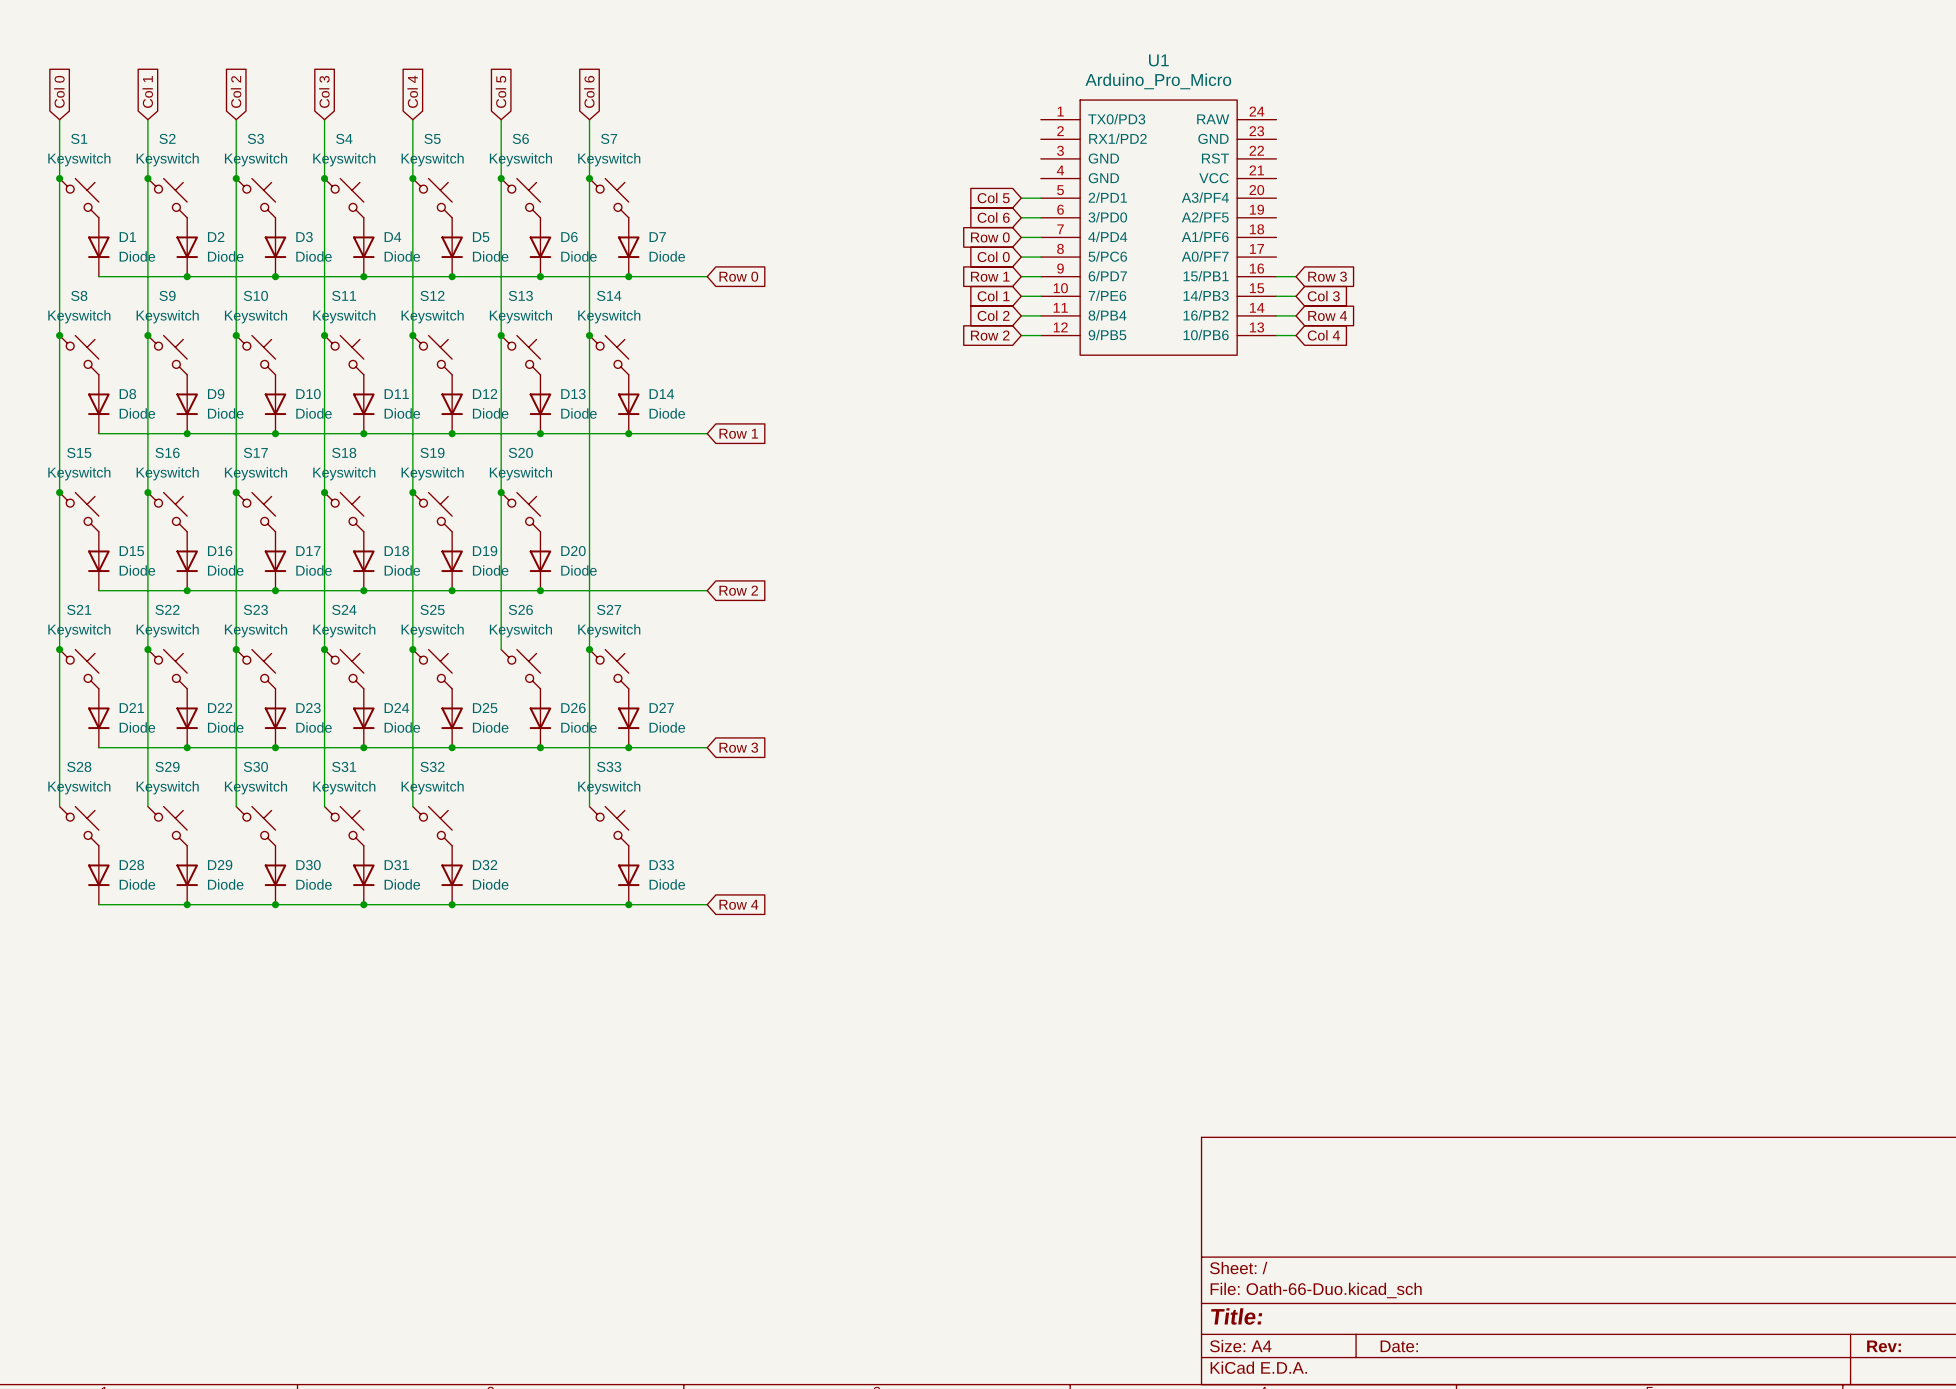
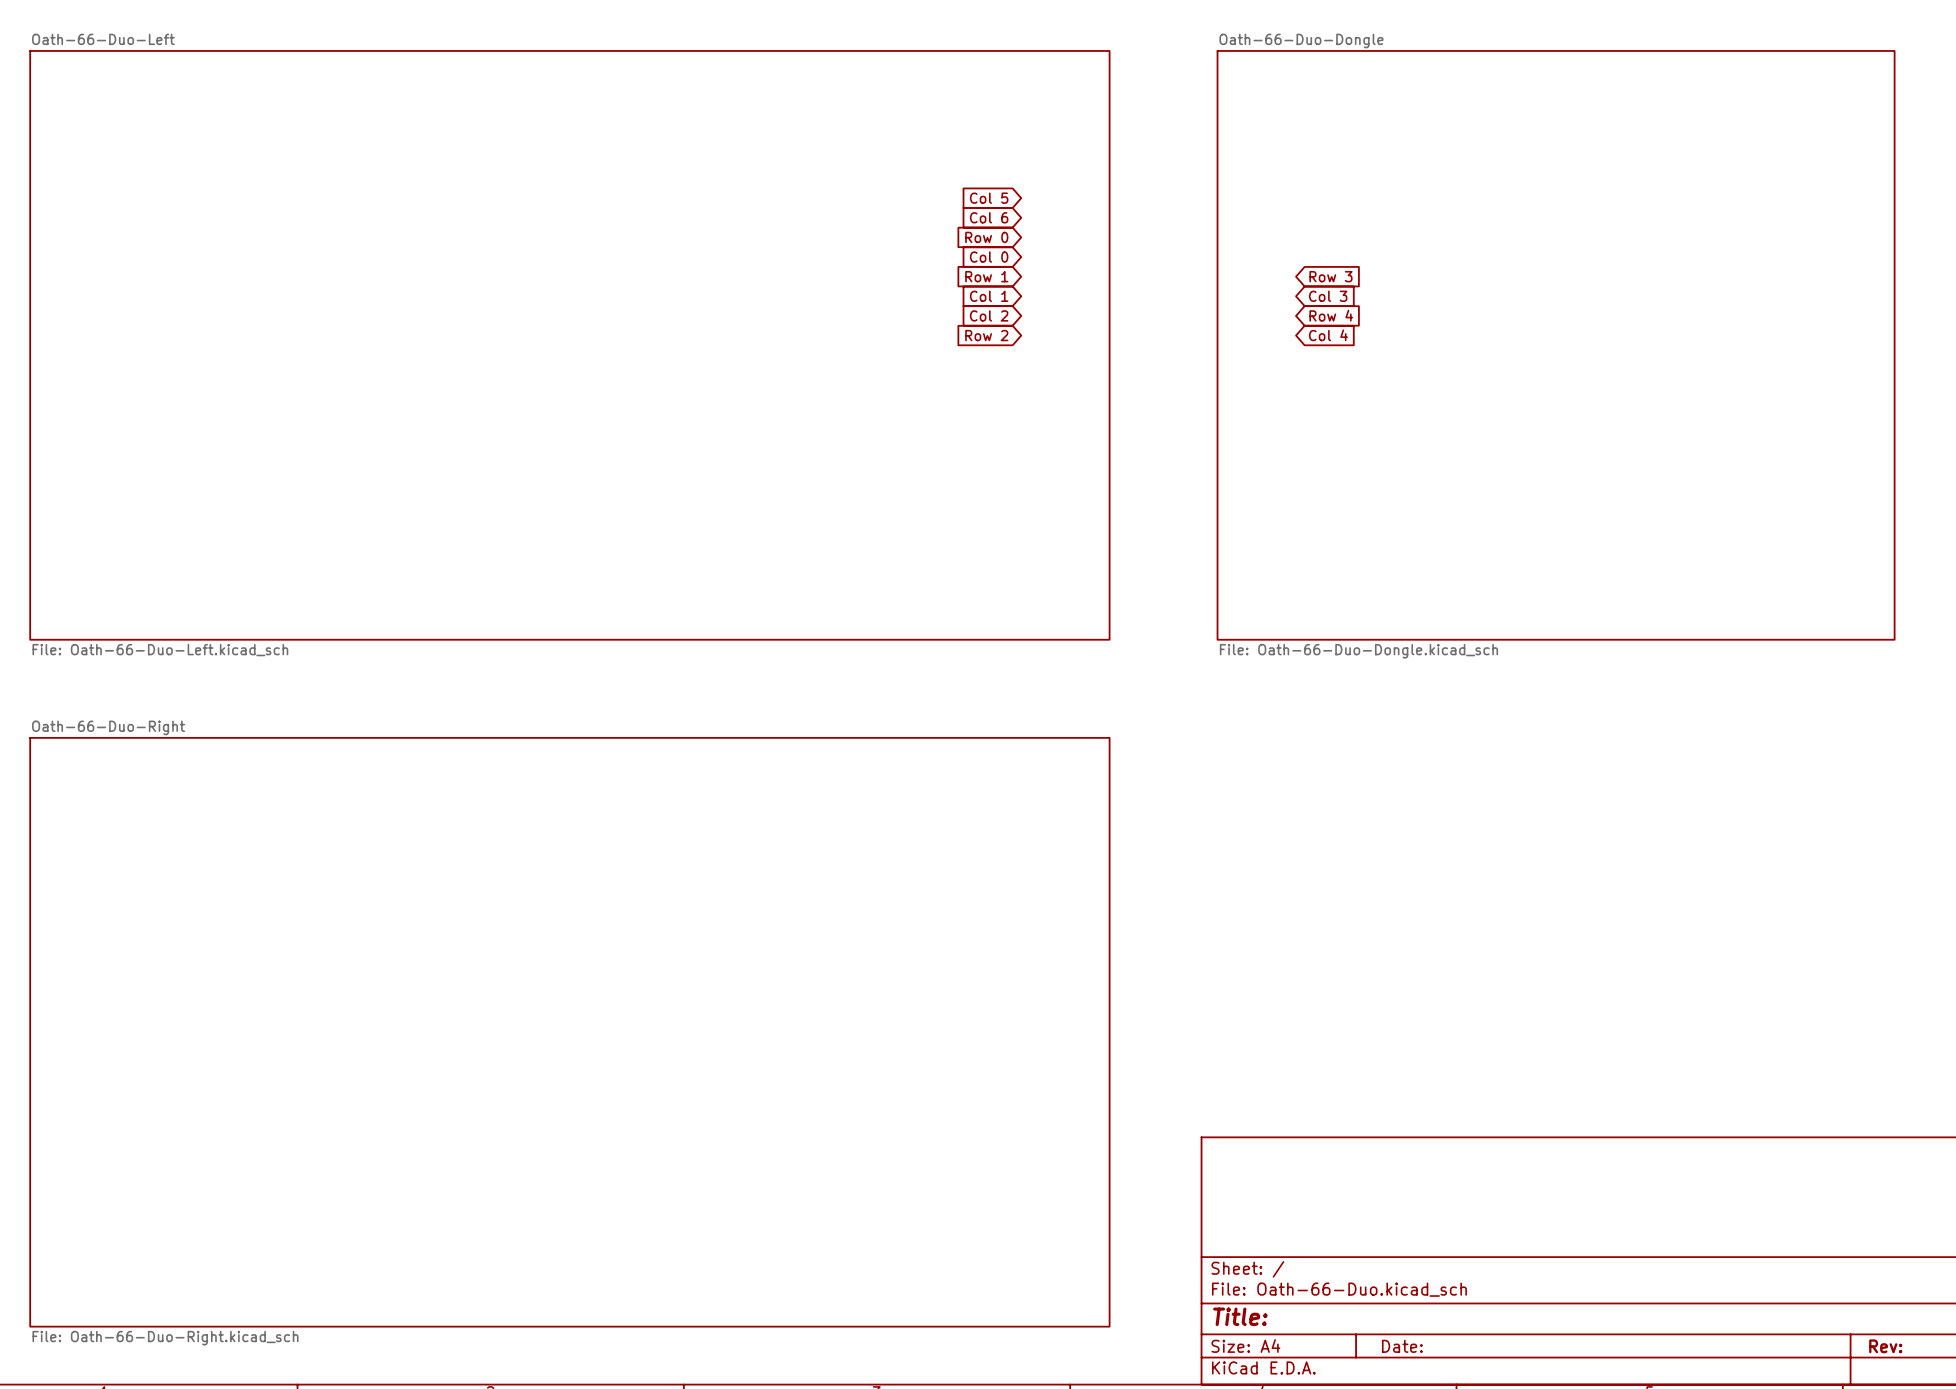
global label: Col 0 (59, 91) -> none
global label: Col 1 (147, 91) -> none
global label: Col 2 (236, 91) -> none
global label: Col 3 (324, 91) -> none
global label: Col 4 (412, 91) -> none
global label: Col 5 (500, 91) -> none
global label: Col 6 (589, 91) -> none
wire: (59, 119) (59, 806) -> none
wire: (147, 119) (147, 806) -> none
wire: (236, 119) (236, 806) -> none
wire: (324, 119) (324, 806) -> none
wire: (412, 119) (412, 806) -> none
wire: (501, 119) (501, 649) -> none
wire: (589, 119) (589, 806) -> none
junction: (59, 178) -> none
junction: (147, 178) -> none
junction: (236, 178) -> none
junction: (324, 178) -> none
junction: (412, 178) -> none
junction: (501, 178) -> none
junction: (589, 178) -> none
S1: Keyswitch (79, 198) -> none
S2: Keyswitch (167, 198) -> none
S3: Keyswitch (255, 198) -> none
S4: Keyswitch (344, 198) -> none
S5: Keyswitch (432, 198) -> none
S6: Keyswitch (520, 198) -> none
S7: Keyswitch (609, 198) -> none
wire: (1021, 198) (1040, 198) -> none
wire: (1021, 217) (1040, 217) -> none
U1: Arduino_Pro_Micro (1158, 227) -> none
wire: (1021, 237) (1040, 237) -> none
D1: Diode (98, 247) -> none
D2: Diode (187, 247) -> none
D3: Diode (275, 247) -> none
D4: Diode (363, 247) -> none
D5: Diode (452, 247) -> none
D6: Diode (540, 247) -> none
D7: Diode (628, 247) -> none
wire: (1021, 257) (1040, 257) -> none
wire: (98, 276) (707, 276) -> none
junction: (187, 276) -> none
junction: (275, 276) -> none
junction: (363, 276) -> none
junction: (452, 276) -> none
junction: (540, 276) -> none
junction: (628, 276) -> none
global label: Row 0 (738, 276) -> none
wire: (1021, 276) (1040, 276) -> none
wire: (1276, 276) (1296, 276) -> none
wire: (1021, 296) (1040, 296) -> none
wire: (1276, 296) (1296, 296) -> none
wire: (1021, 315) (1040, 315) -> none
wire: (1276, 315) (1296, 315) -> none
junction: (59, 335) -> none
junction: (147, 335) -> none
junction: (236, 335) -> none
junction: (324, 335) -> none
junction: (412, 335) -> none
junction: (501, 335) -> none
junction: (589, 335) -> none
wire: (1021, 335) (1040, 335) -> none
wire: (1276, 335) (1296, 335) -> none
sheet Oath-66-Duo-Left: none -> File: Oath-66-Duo-Left.kicad_sch (569, 345)
sheet Oath-66-Duo-Dongle: none -> File: Oath-66-Duo-Dongle.kicad_sch (1556, 345)
S8: Keyswitch (79, 355) -> none
S9: Keyswitch (167, 355) -> none
S10: Keyswitch (255, 355) -> none
S11: Keyswitch (344, 355) -> none
S12: Keyswitch (432, 355) -> none
S13: Keyswitch (520, 355) -> none
S14: Keyswitch (609, 355) -> none
D8: Diode (98, 404) -> none
D9: Diode (187, 404) -> none
D10: Diode (275, 404) -> none
D11: Diode (363, 404) -> none
D12: Diode (452, 404) -> none
D13: Diode (540, 404) -> none
D14: Diode (628, 404) -> none
wire: (98, 433) (707, 433) -> none
junction: (187, 433) -> none
junction: (275, 433) -> none
junction: (363, 433) -> none
junction: (452, 433) -> none
junction: (540, 433) -> none
junction: (628, 433) -> none
global label: Row 1 (738, 433) -> none
junction: (59, 492) -> none
junction: (147, 492) -> none
junction: (236, 492) -> none
junction: (324, 492) -> none
junction: (412, 492) -> none
junction: (501, 492) -> none
S15: Keyswitch (79, 512) -> none
S16: Keyswitch (167, 512) -> none
S17: Keyswitch (255, 512) -> none
S18: Keyswitch (344, 512) -> none
S19: Keyswitch (432, 512) -> none
S20: Keyswitch (520, 512) -> none
D15: Diode (98, 561) -> none
D16: Diode (187, 561) -> none
D17: Diode (275, 561) -> none
D18: Diode (363, 561) -> none
D19: Diode (452, 561) -> none
D20: Diode (540, 561) -> none
wire: (98, 590) (707, 590) -> none
junction: (187, 590) -> none
junction: (275, 590) -> none
junction: (363, 590) -> none
junction: (452, 590) -> none
junction: (540, 590) -> none
global label: Row 2 (738, 590) -> none
junction: (59, 649) -> none
junction: (147, 649) -> none
junction: (236, 649) -> none
junction: (324, 649) -> none
junction: (412, 649) -> none
junction: (589, 649) -> none
S21: Keyswitch (79, 669) -> none
S22: Keyswitch (167, 669) -> none
S23: Keyswitch (255, 669) -> none
S24: Keyswitch (344, 669) -> none
S25: Keyswitch (432, 669) -> none
S26: Keyswitch (520, 669) -> none
S27: Keyswitch (609, 669) -> none
D21: Diode (98, 718) -> none
D22: Diode (187, 718) -> none
D23: Diode (275, 718) -> none
D24: Diode (363, 718) -> none
D25: Diode (452, 718) -> none
D26: Diode (540, 718) -> none
D27: Diode (628, 718) -> none
wire: (98, 747) (707, 747) -> none
junction: (187, 747) -> none
junction: (275, 747) -> none
junction: (363, 747) -> none
junction: (452, 747) -> none
junction: (540, 747) -> none
junction: (628, 747) -> none
global label: Row 3 (738, 747) -> none
S28: Keyswitch (79, 826) -> none
S29: Keyswitch (167, 826) -> none
S30: Keyswitch (255, 826) -> none
S31: Keyswitch (344, 826) -> none
S32: Keyswitch (432, 826) -> none
S33: Keyswitch (609, 826) -> none
D28: Diode (98, 875) -> none
D29: Diode (187, 875) -> none
D30: Diode (275, 875) -> none
D31: Diode (363, 875) -> none
D32: Diode (452, 875) -> none
D33: Diode (628, 875) -> none
wire: (98, 904) (707, 904) -> none
junction: (187, 904) -> none
junction: (275, 904) -> none
junction: (363, 904) -> none
junction: (452, 904) -> none
junction: (628, 904) -> none
global label: Row 4 (738, 904) -> none
sheet Oath-66-Duo-Right: none -> File: Oath-66-Duo-Right.kicad_sch (569, 1032)

